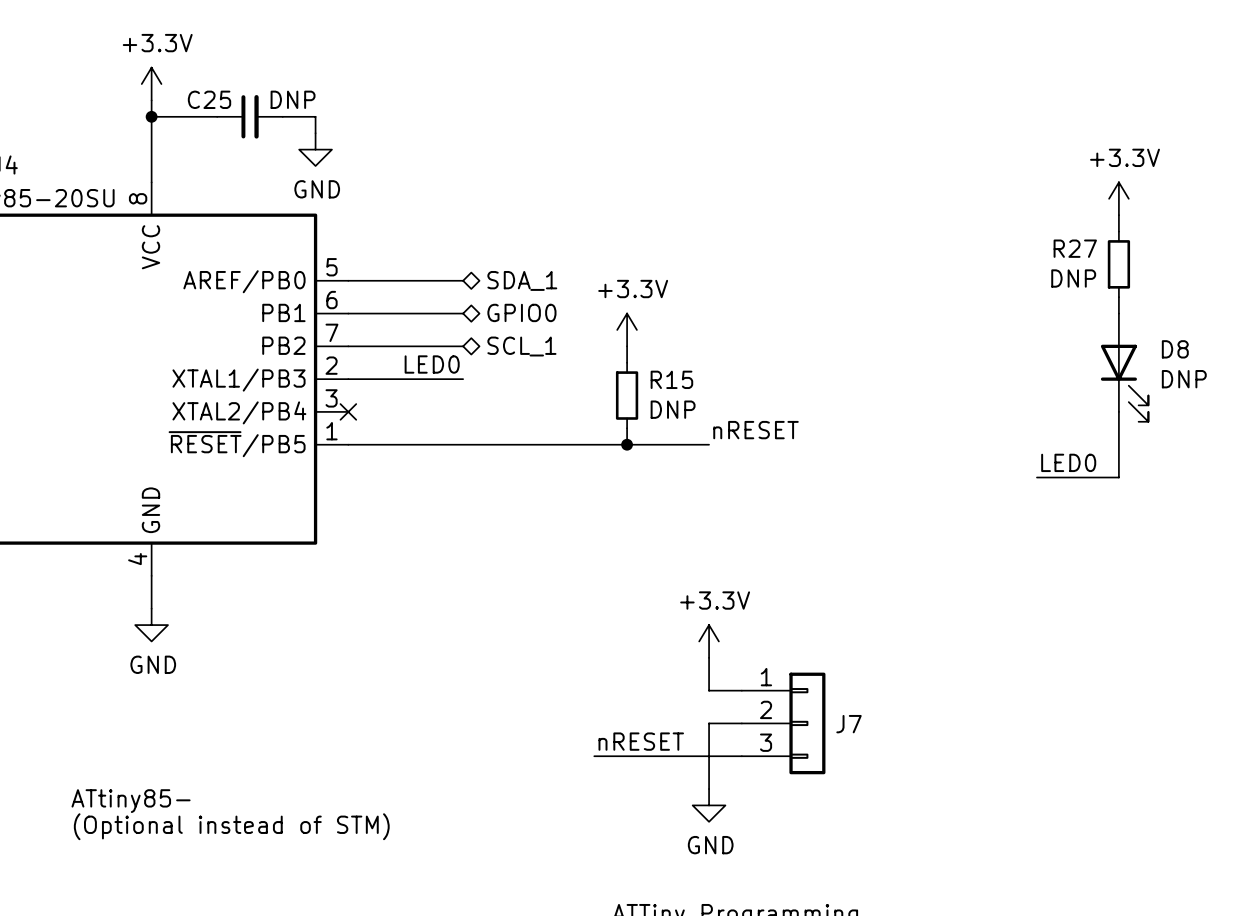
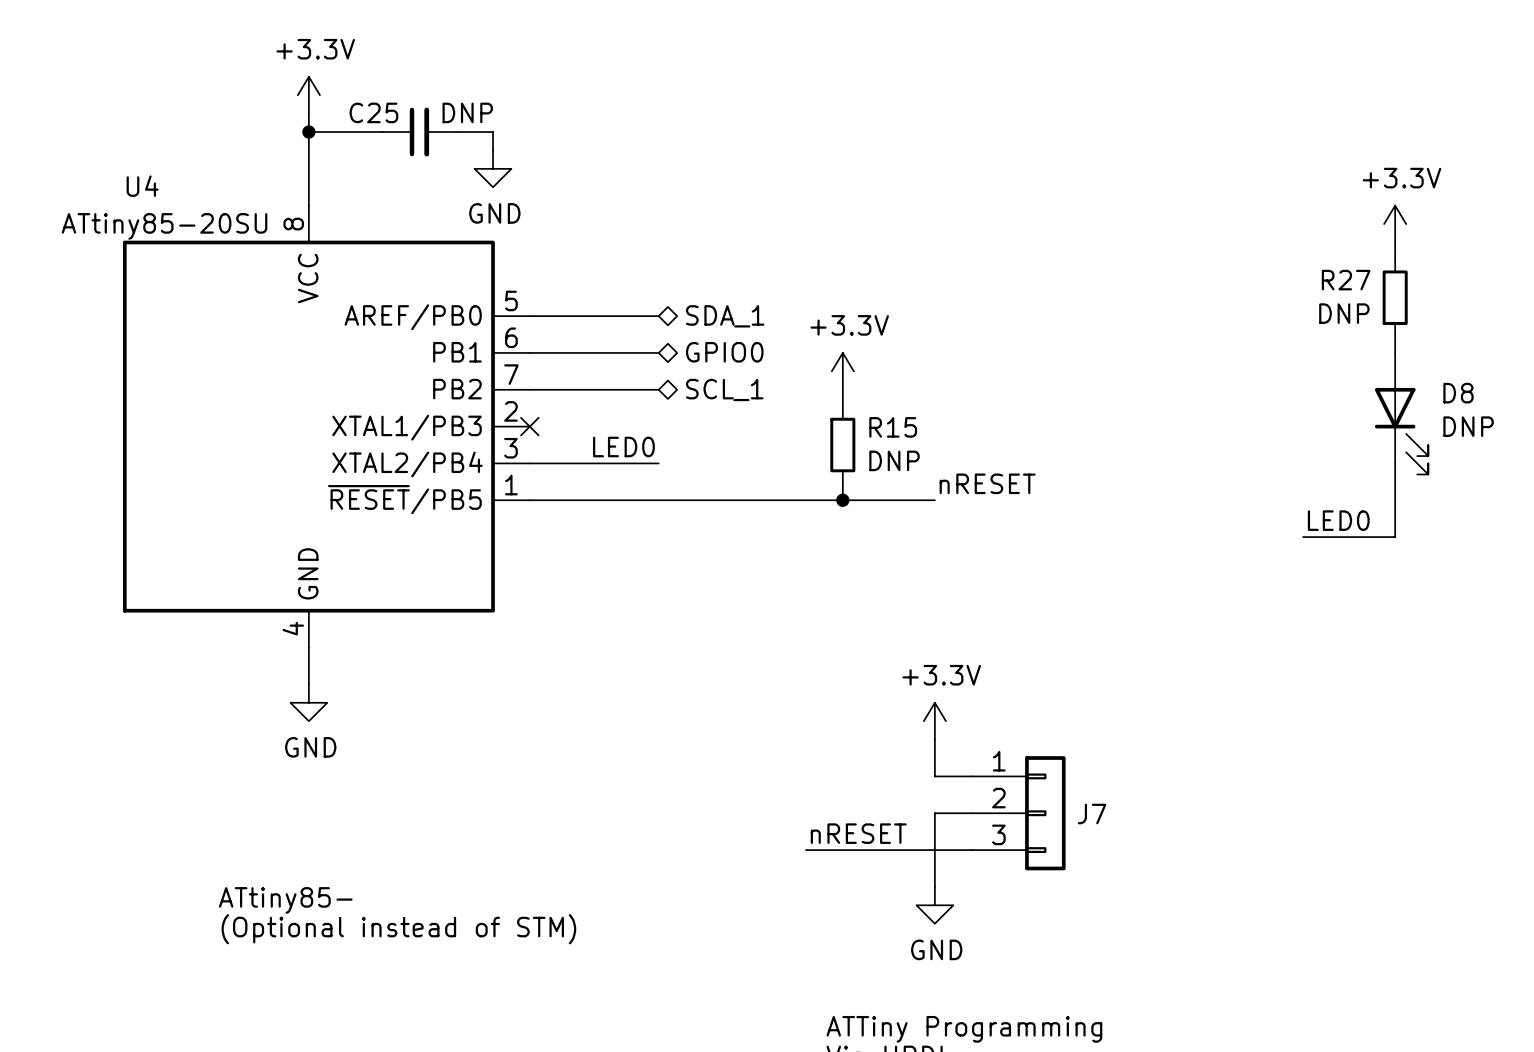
label position: LED0 (432, 364) -> LED0 (623, 447)
wire: (348, 379) (463, 379) -> (529, 463) (658, 463)
no-connect mark position: (348, 411) -> (529, 426)

